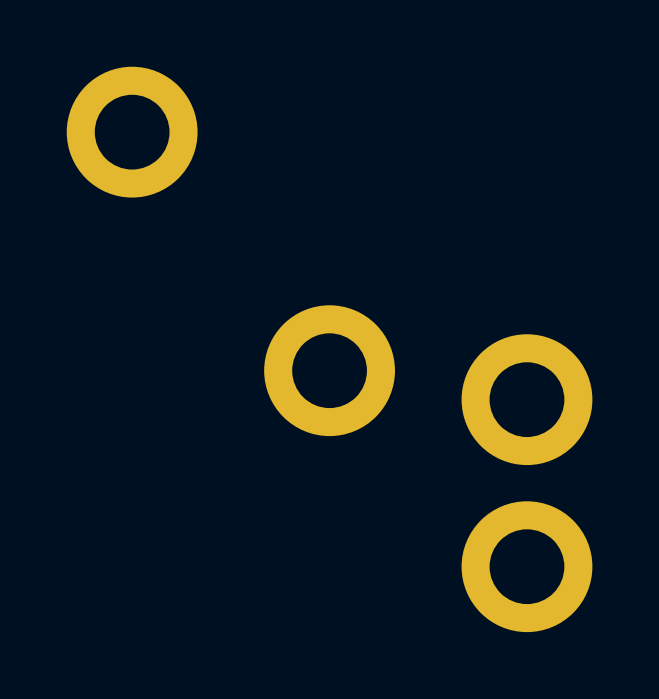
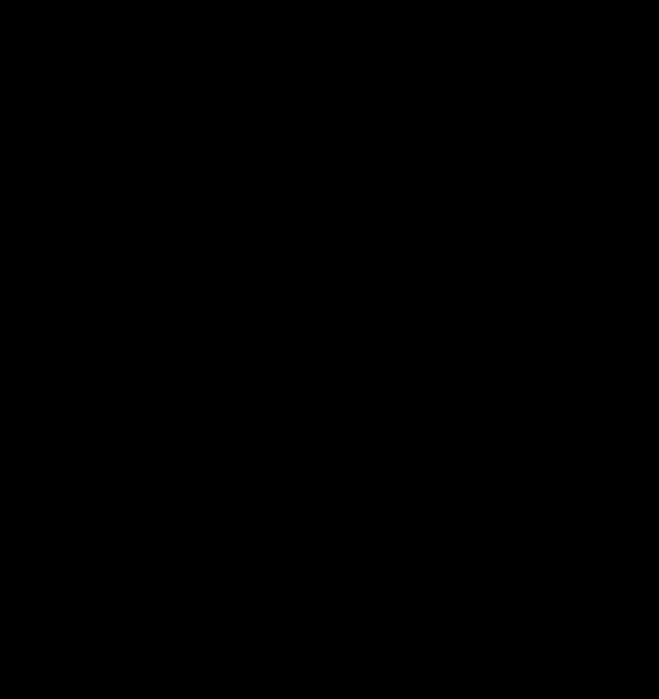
part: (132, 132) -> none
part: (329, 370) -> none
part: (526, 399) -> none
part: (526, 566) -> none

